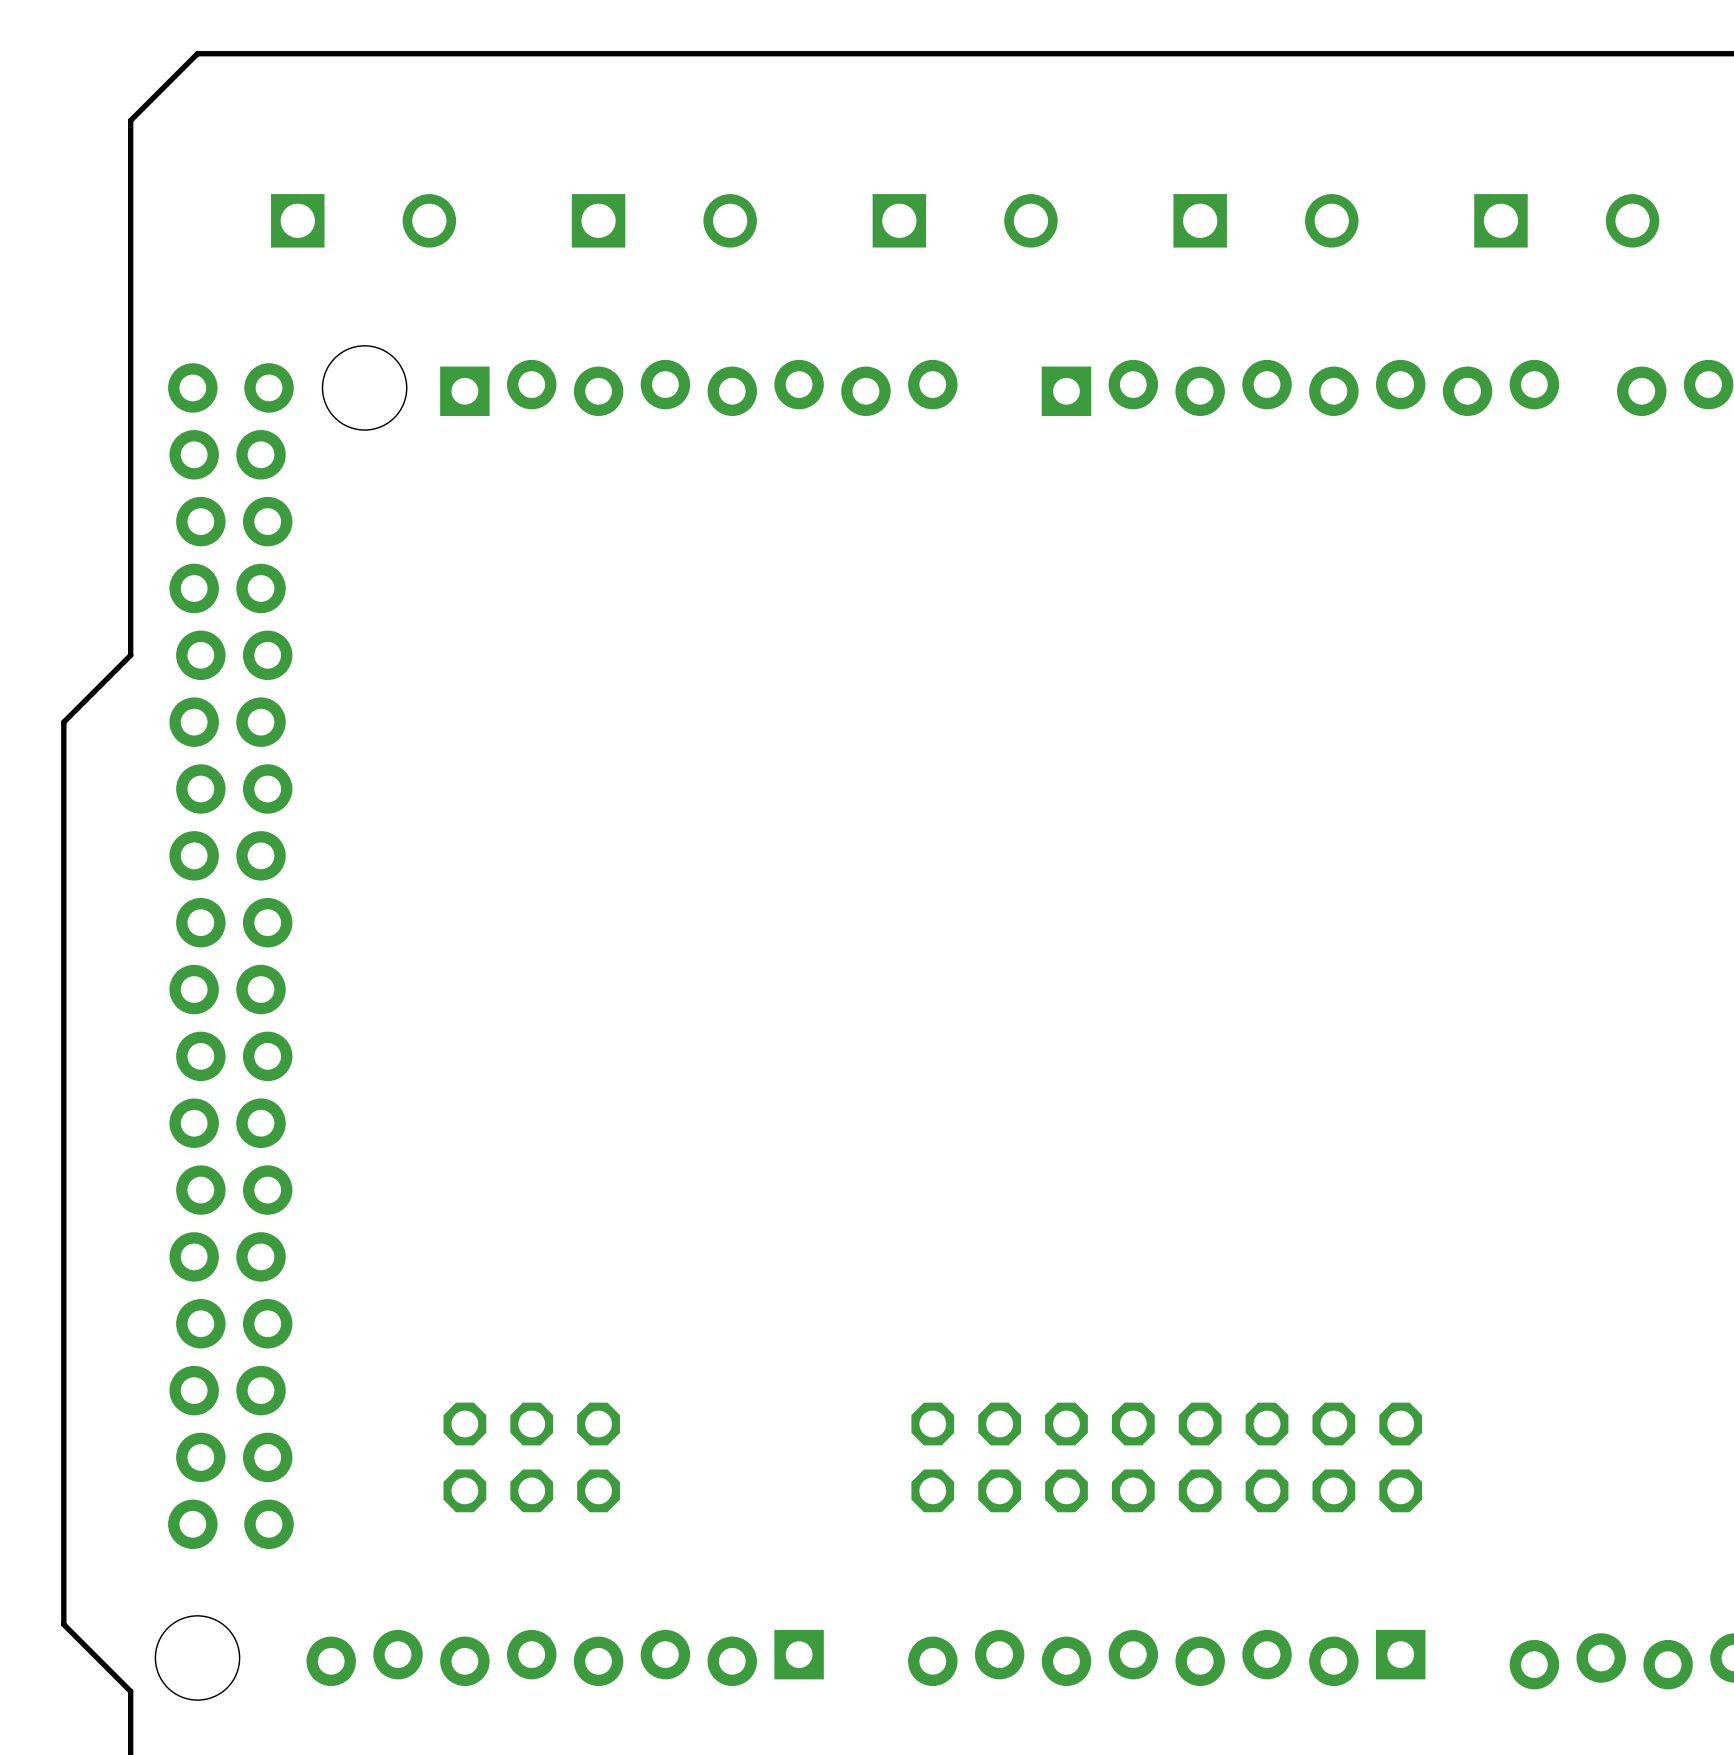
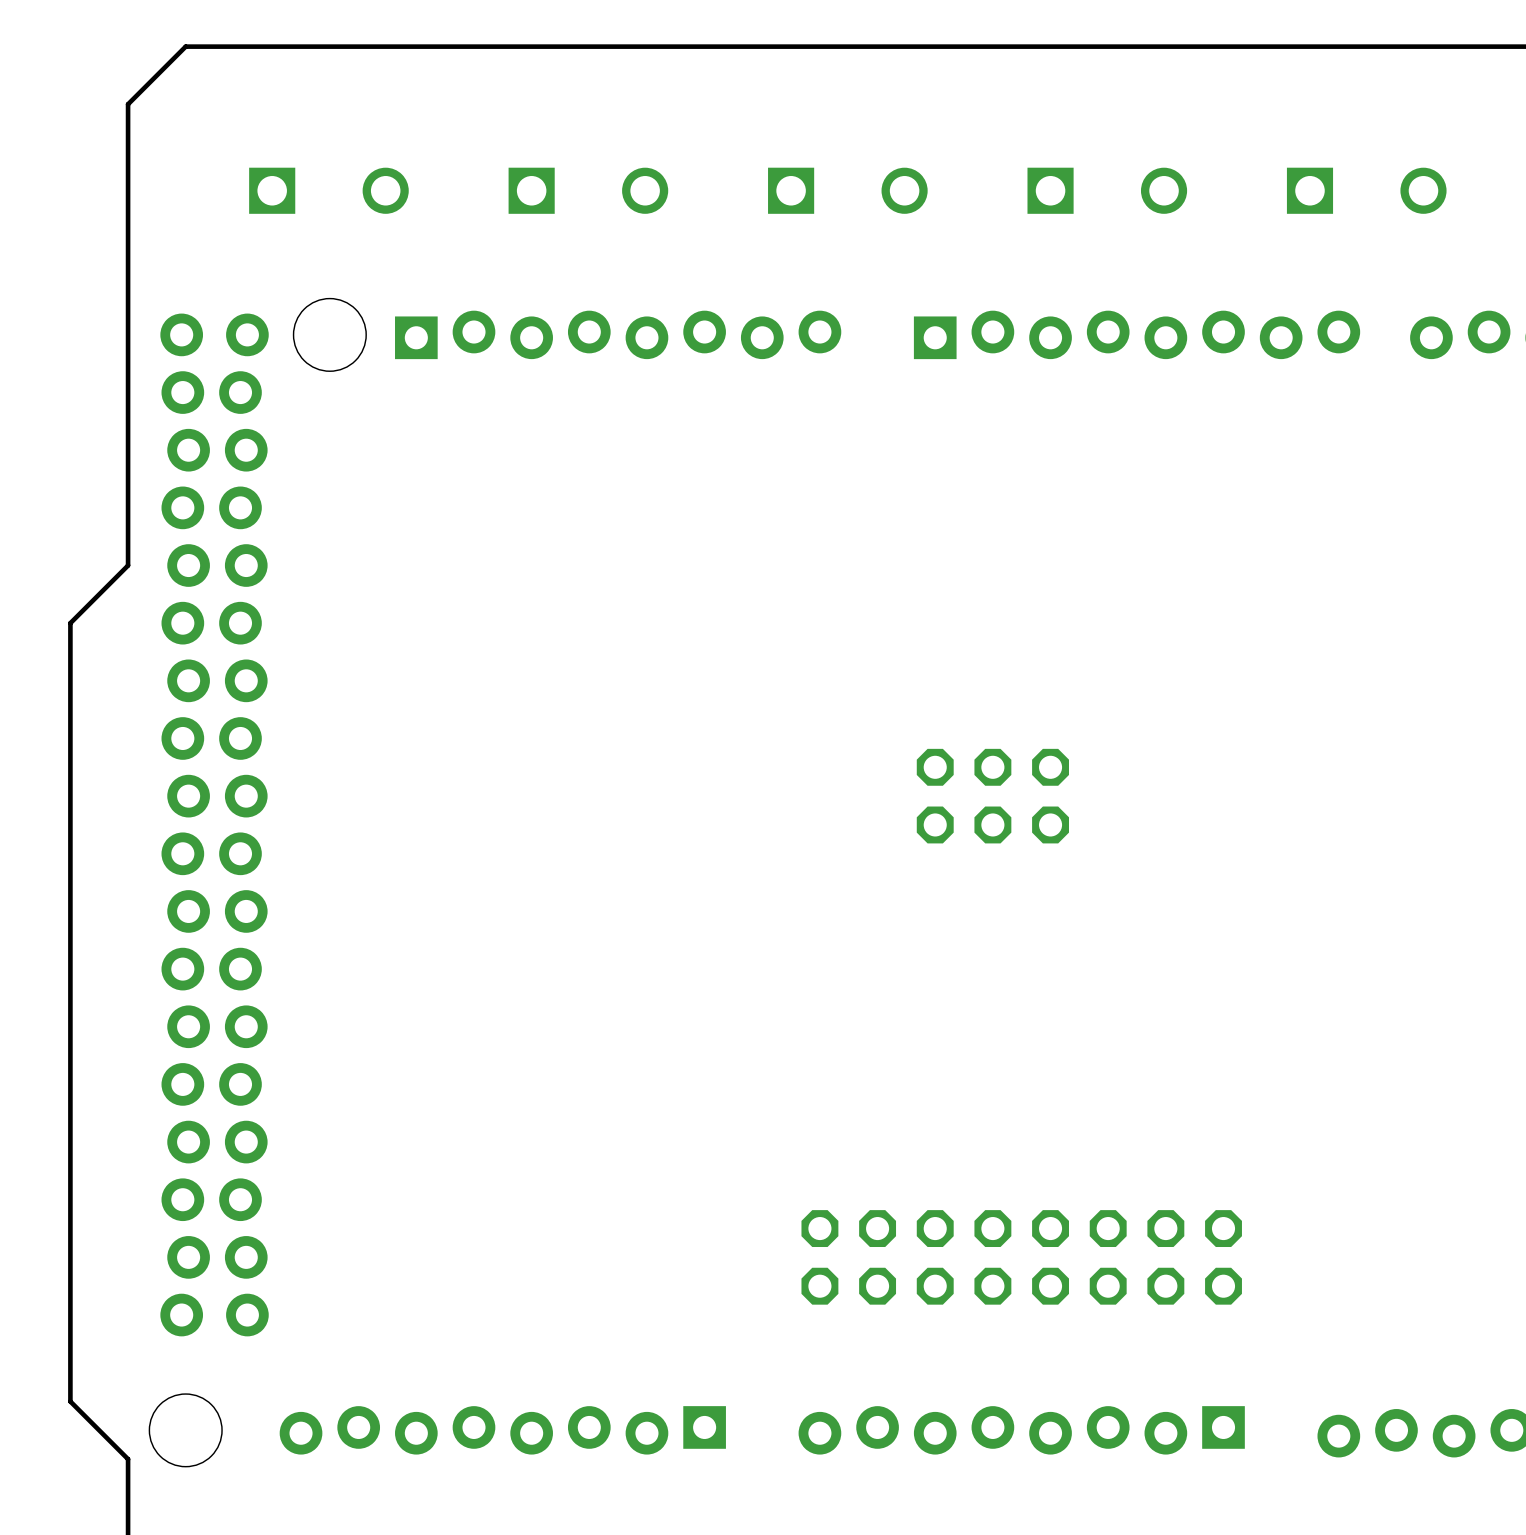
part: none -> (992, 796)
part: (531, 1457) -> none

